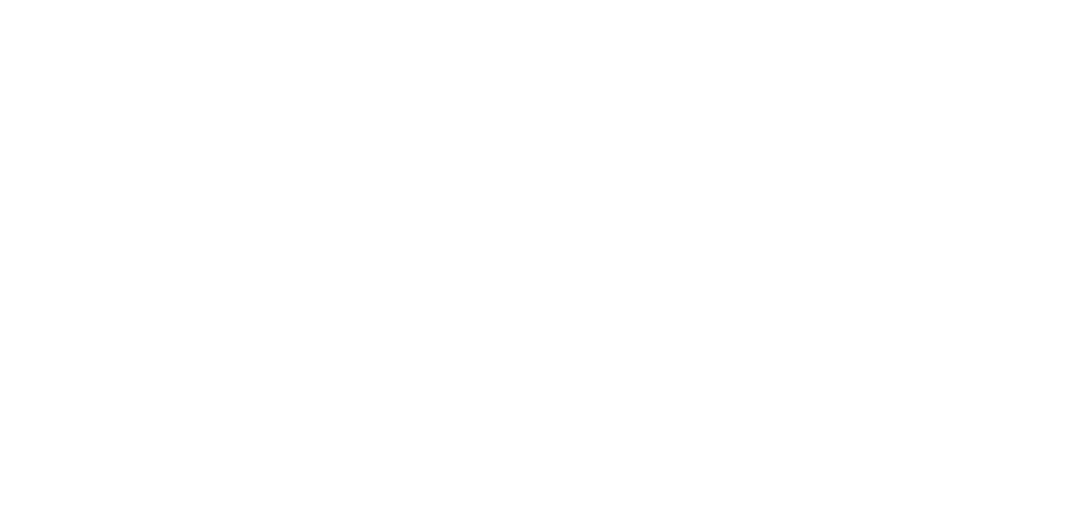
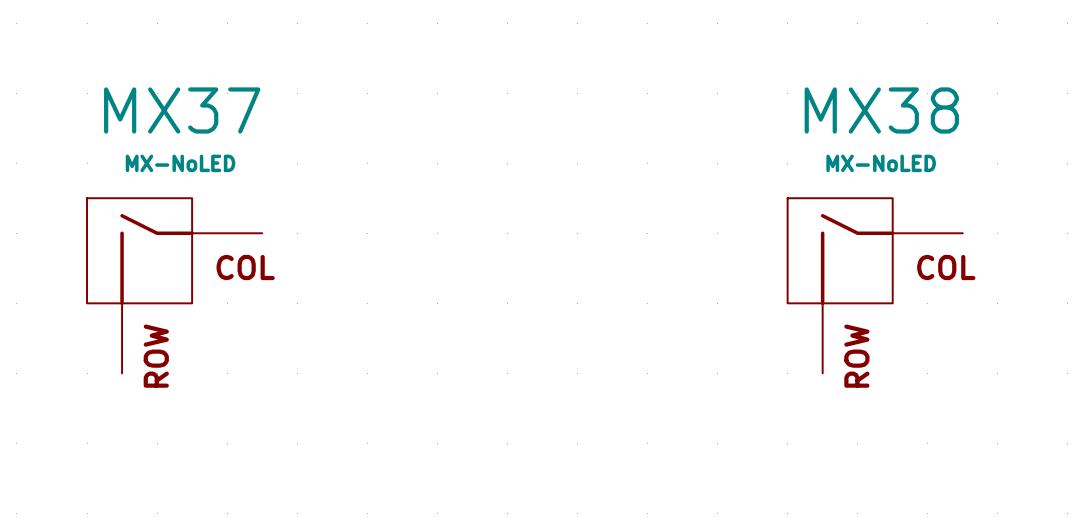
MX37: none -> MX-NoLED (174, 285)
MX38: none -> MX-NoLED (875, 285)

